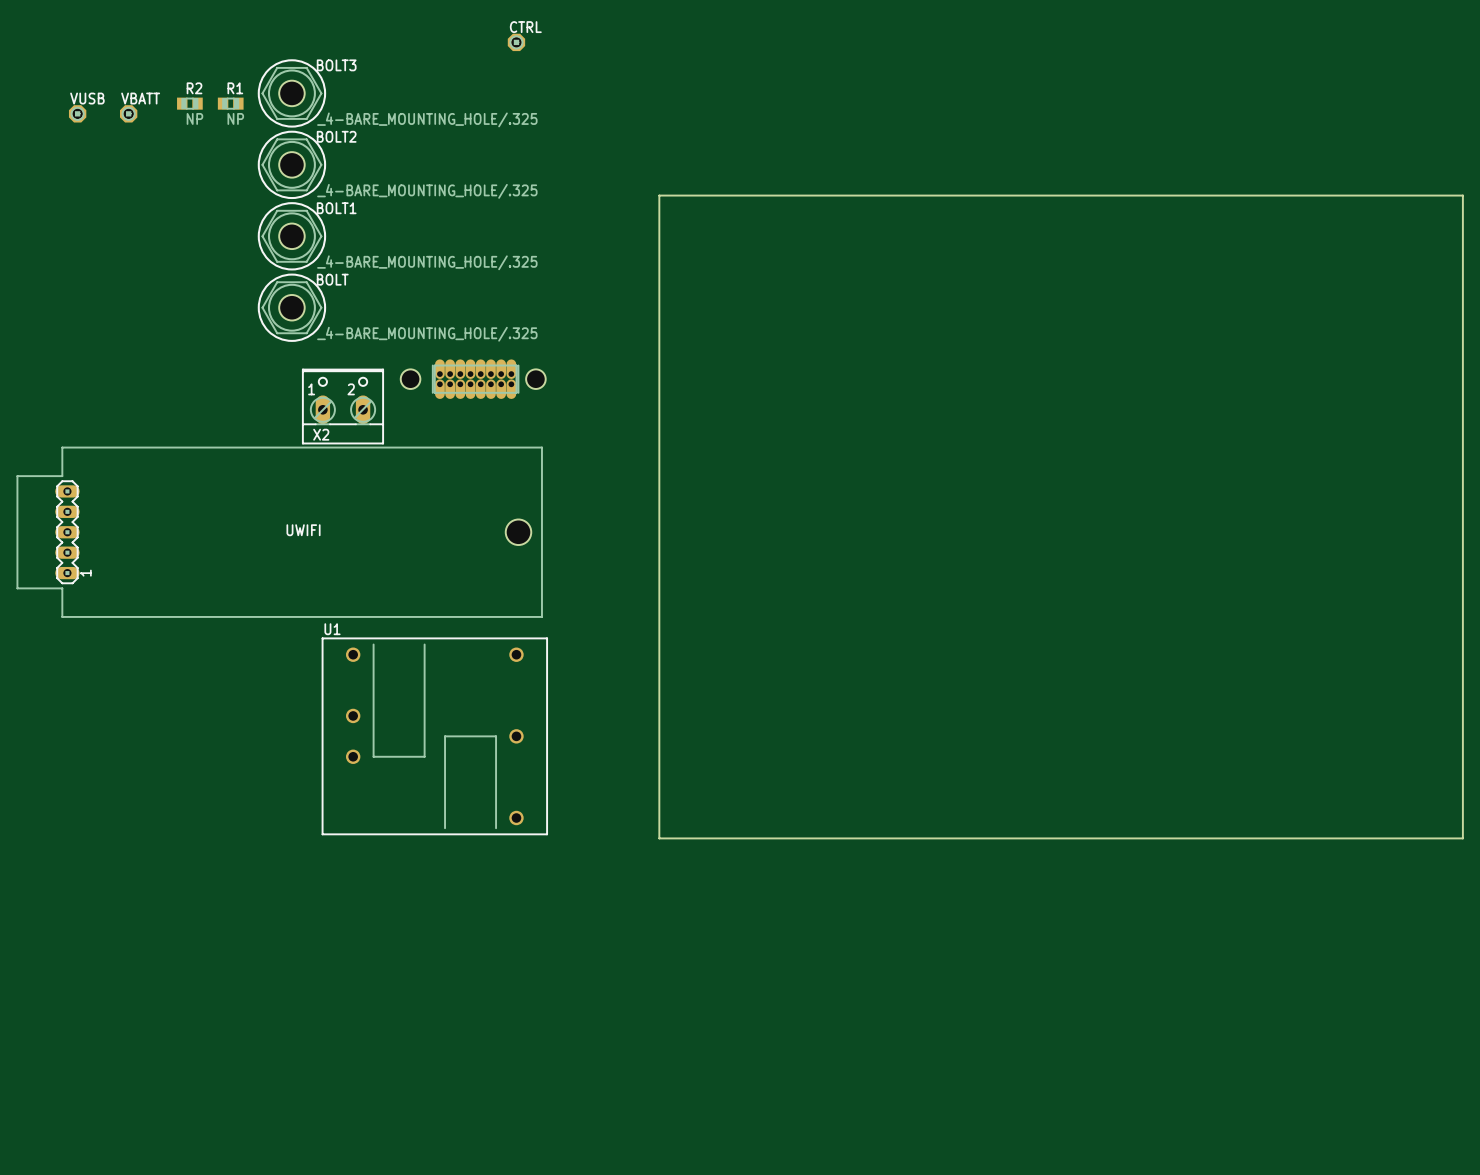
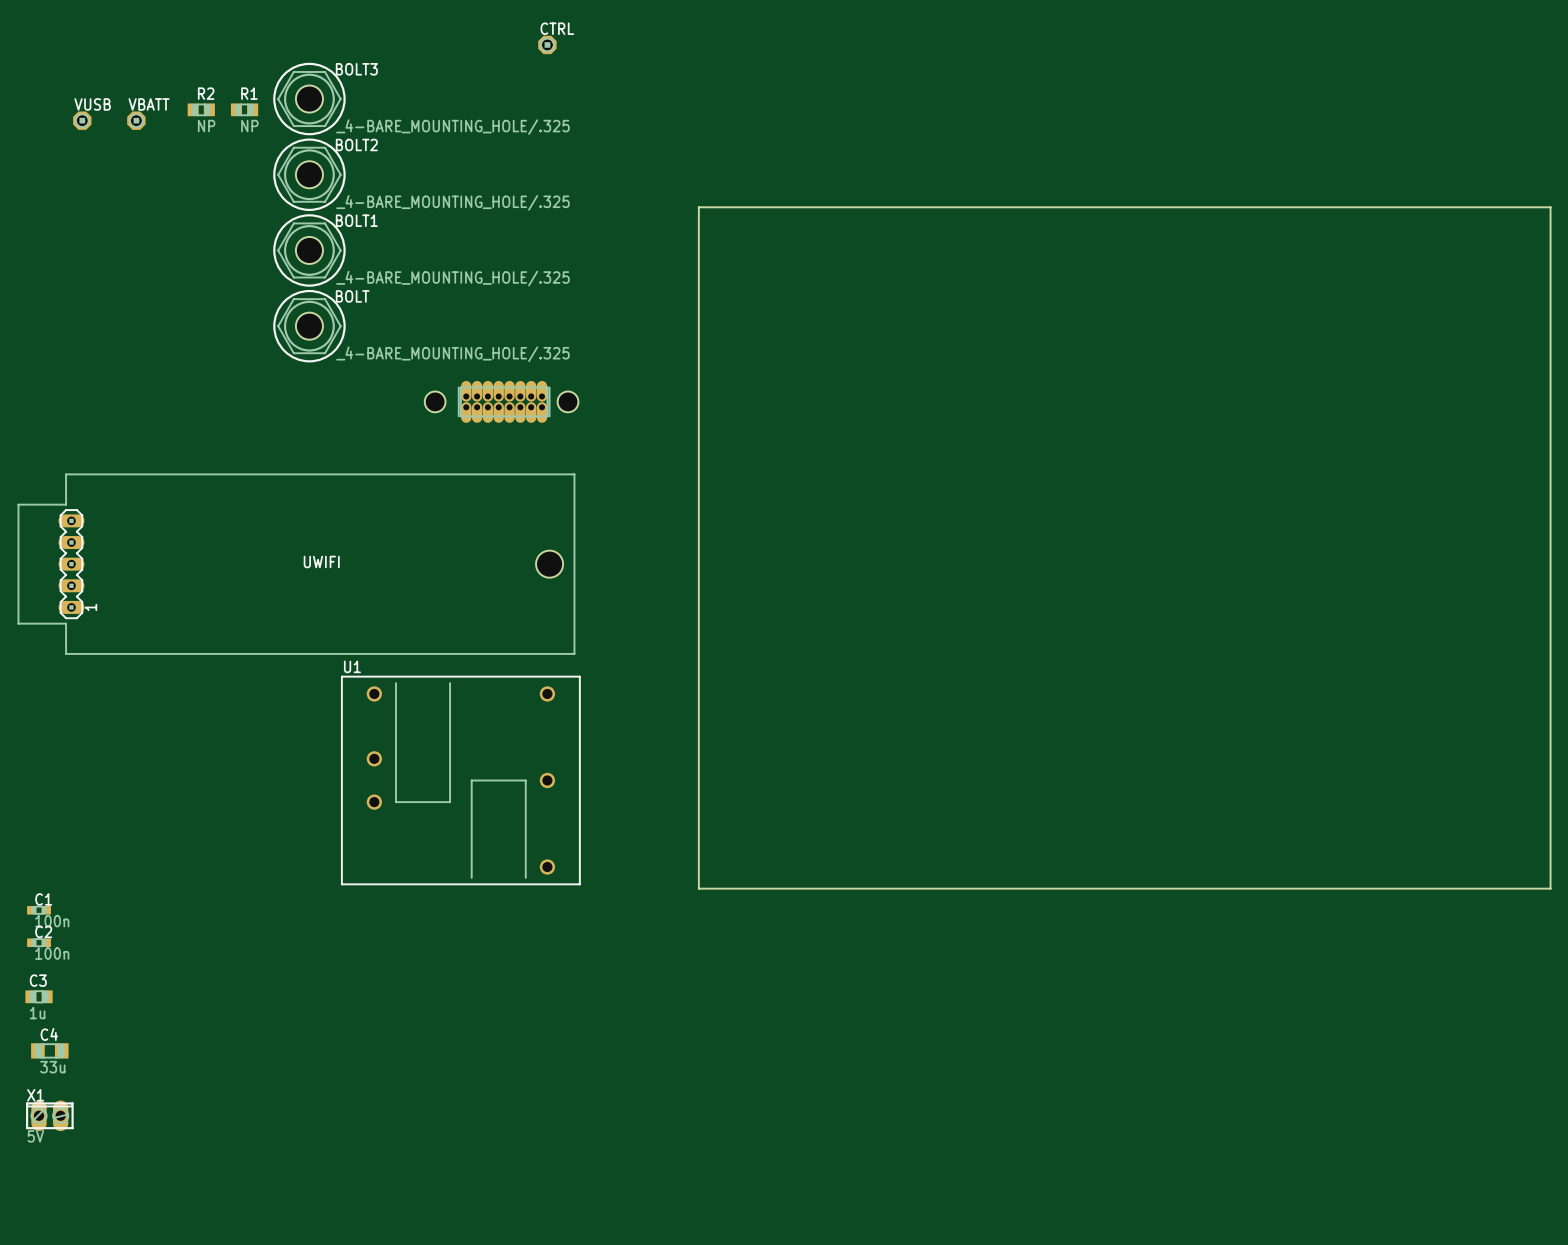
X2: (342, 406) -> none
C1: none -> 100n (39, 910)
C2: none -> 100n (39, 942)
C3: none -> 1u (39, 996)
C4: none -> 33u (49, 1050)
X1: none -> 5V (49, 1115)

